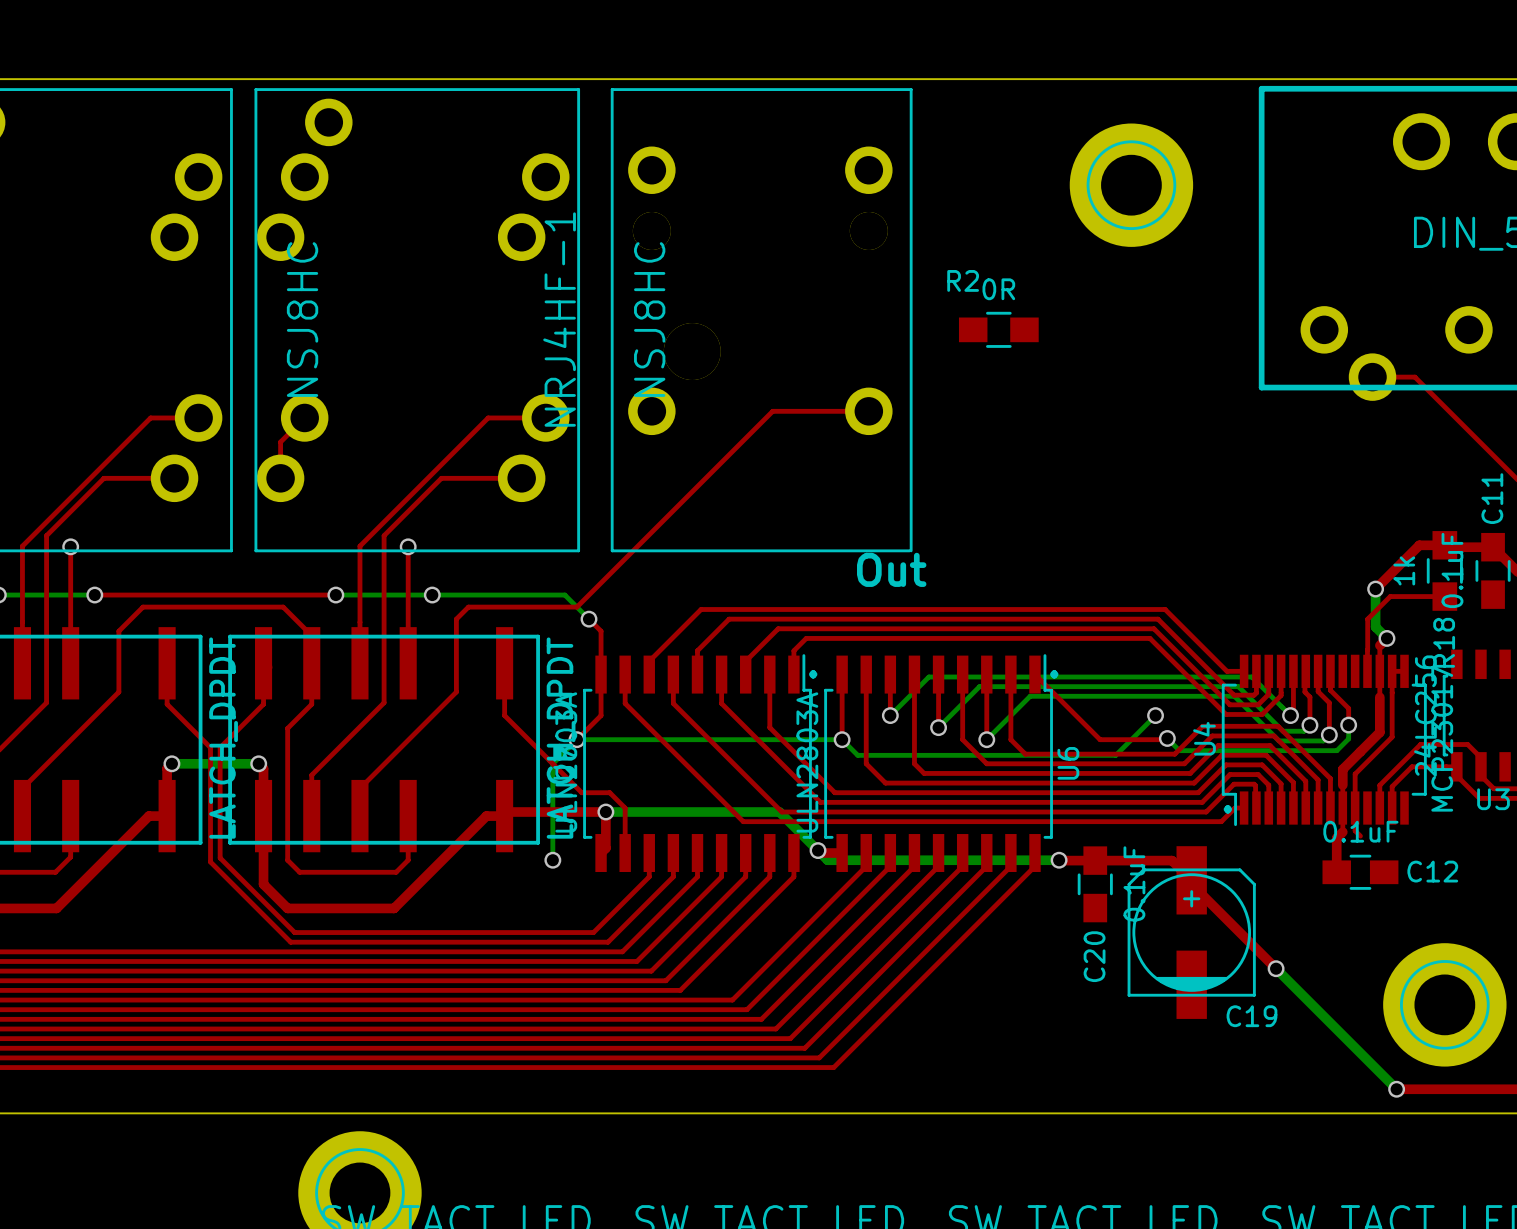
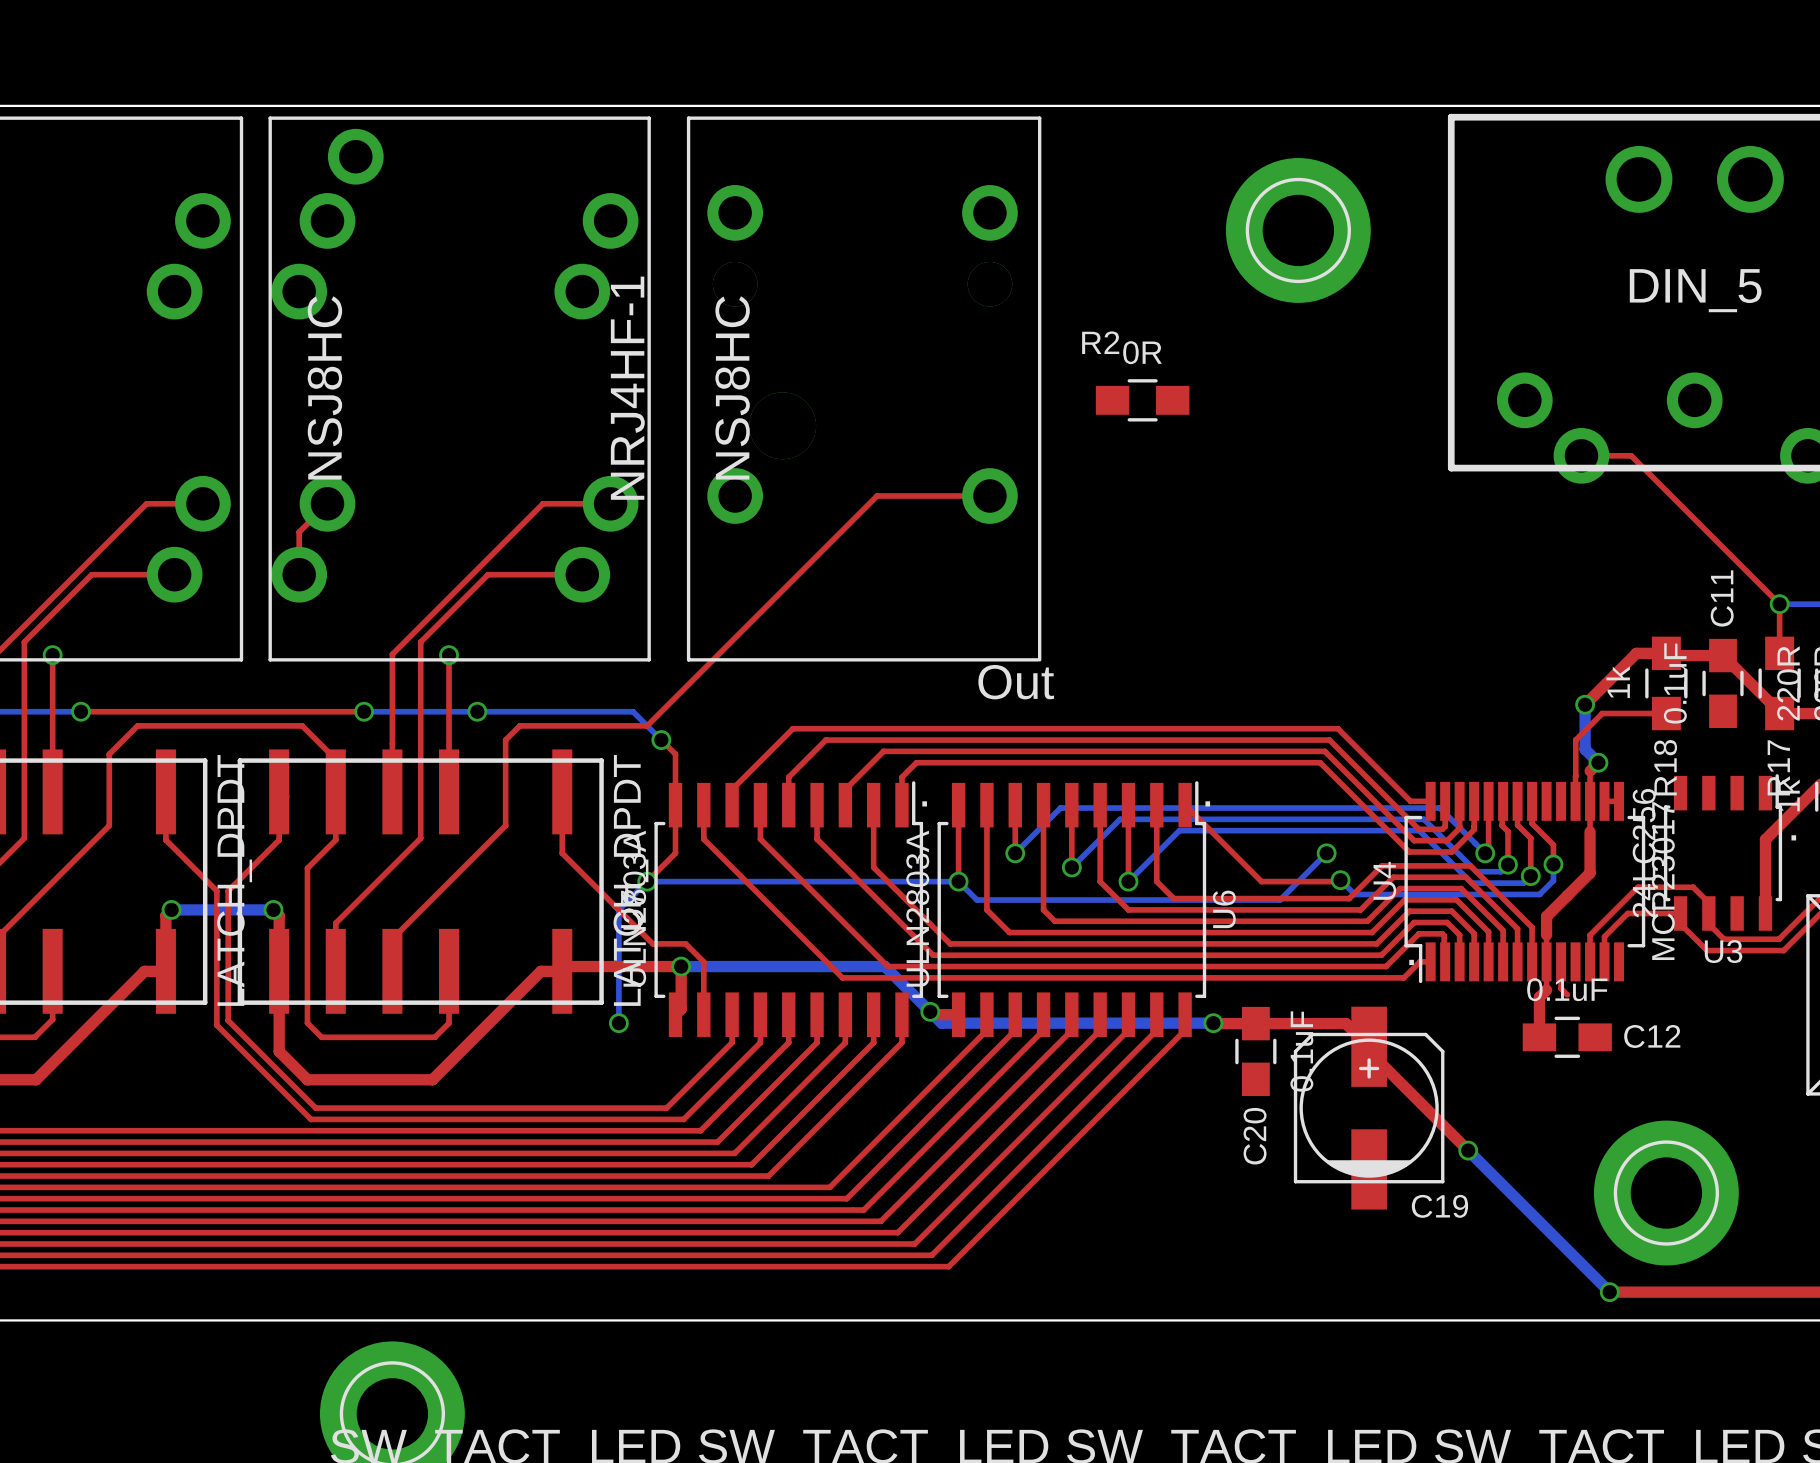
top track: (1392, 671) (1392, 737) (1355, 774) (1355, 808) -> none

